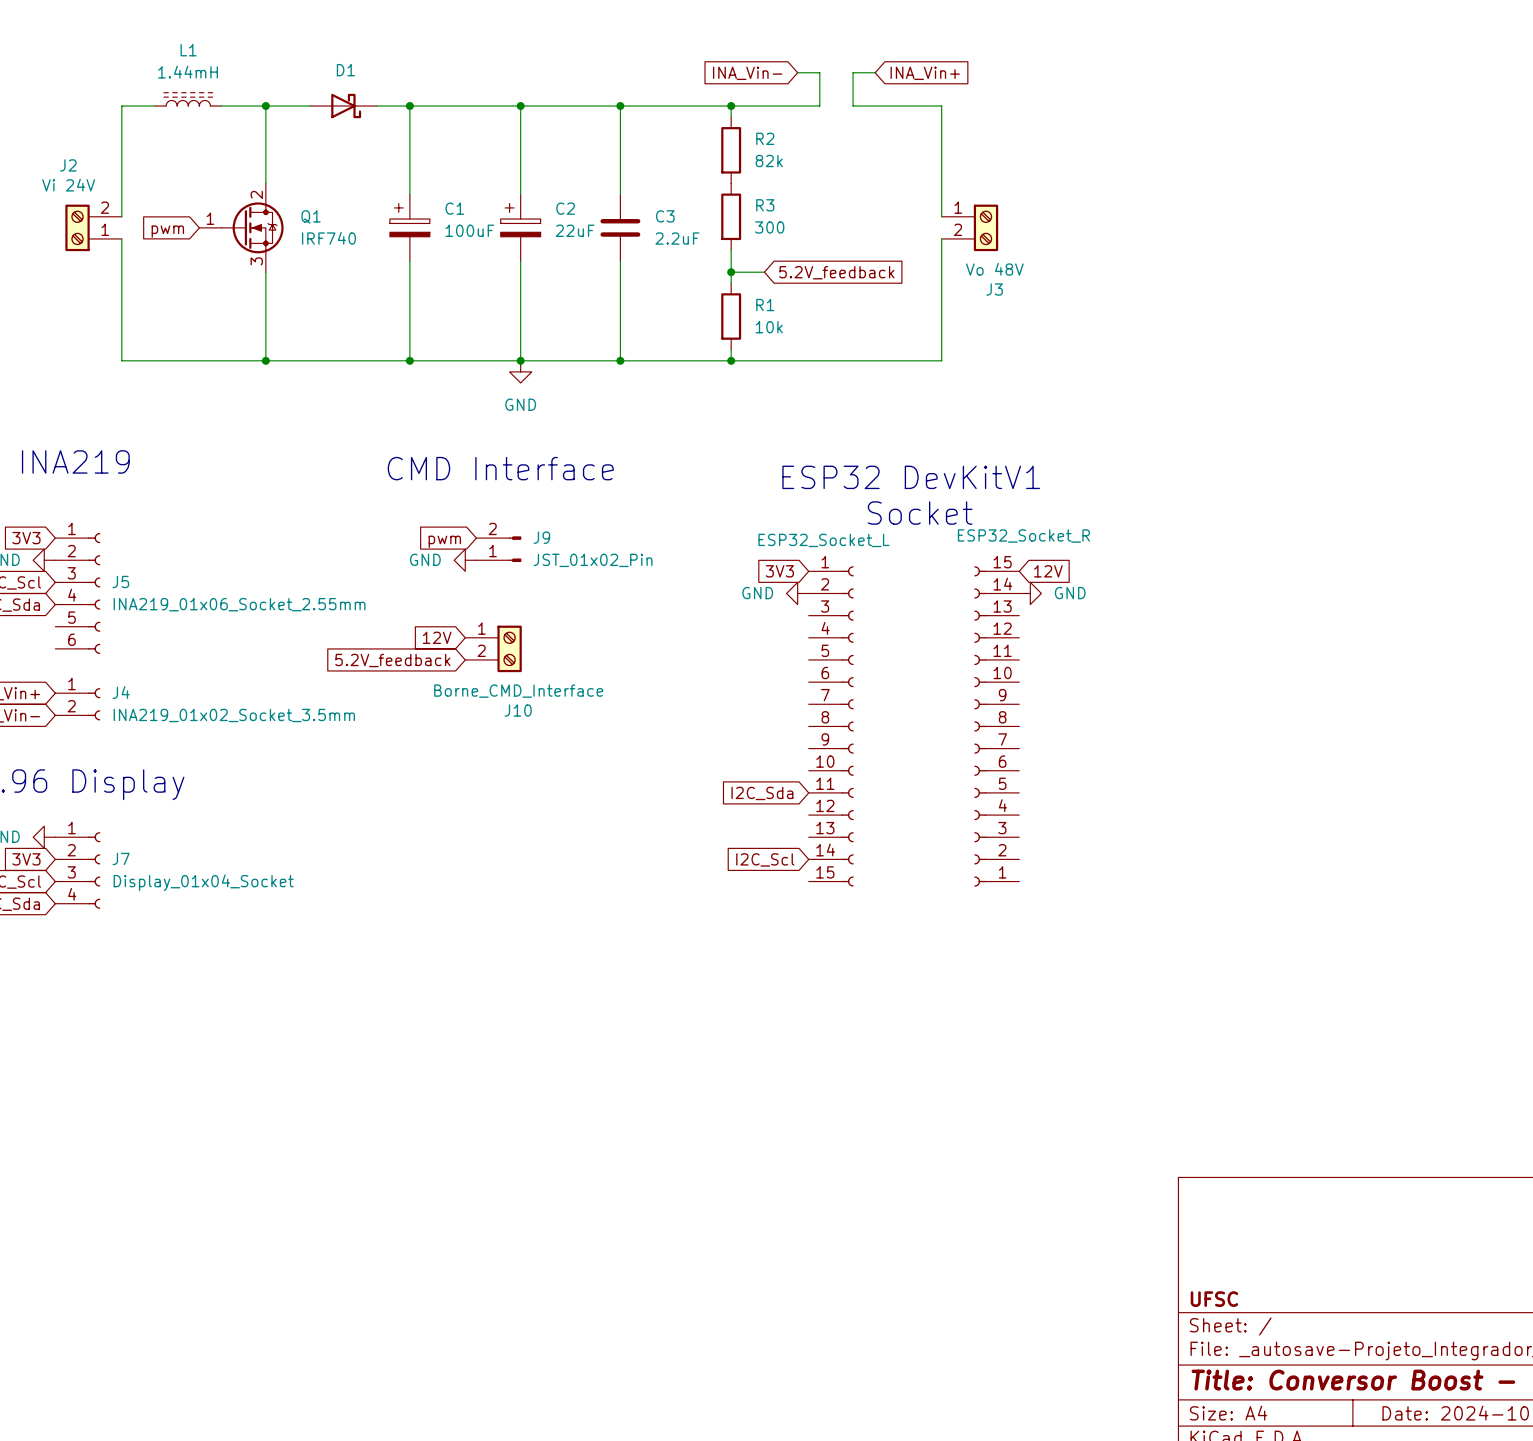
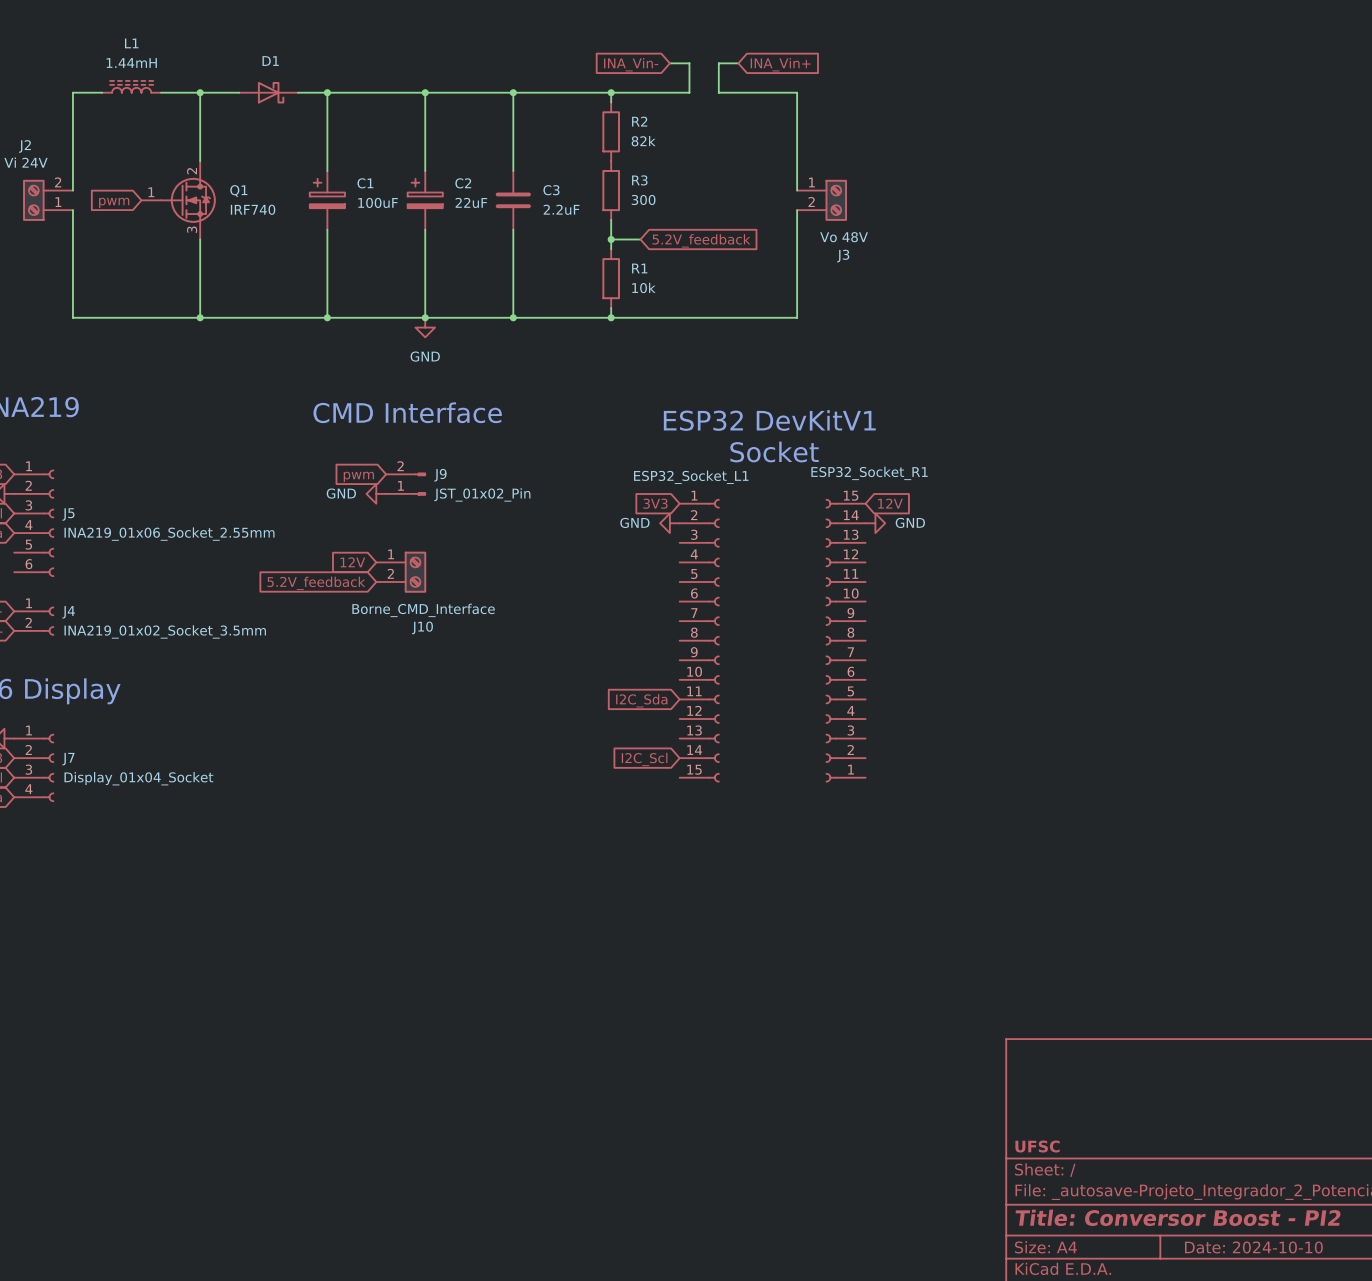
ESP32_Socket_R name: ESP32_Socket_R (1023, 535) -> ESP32_Socket_R1 (869, 473)
ESP32_Socket_L name: ESP32_Socket_L (823, 540) -> ESP32_Socket_L1 (691, 477)

